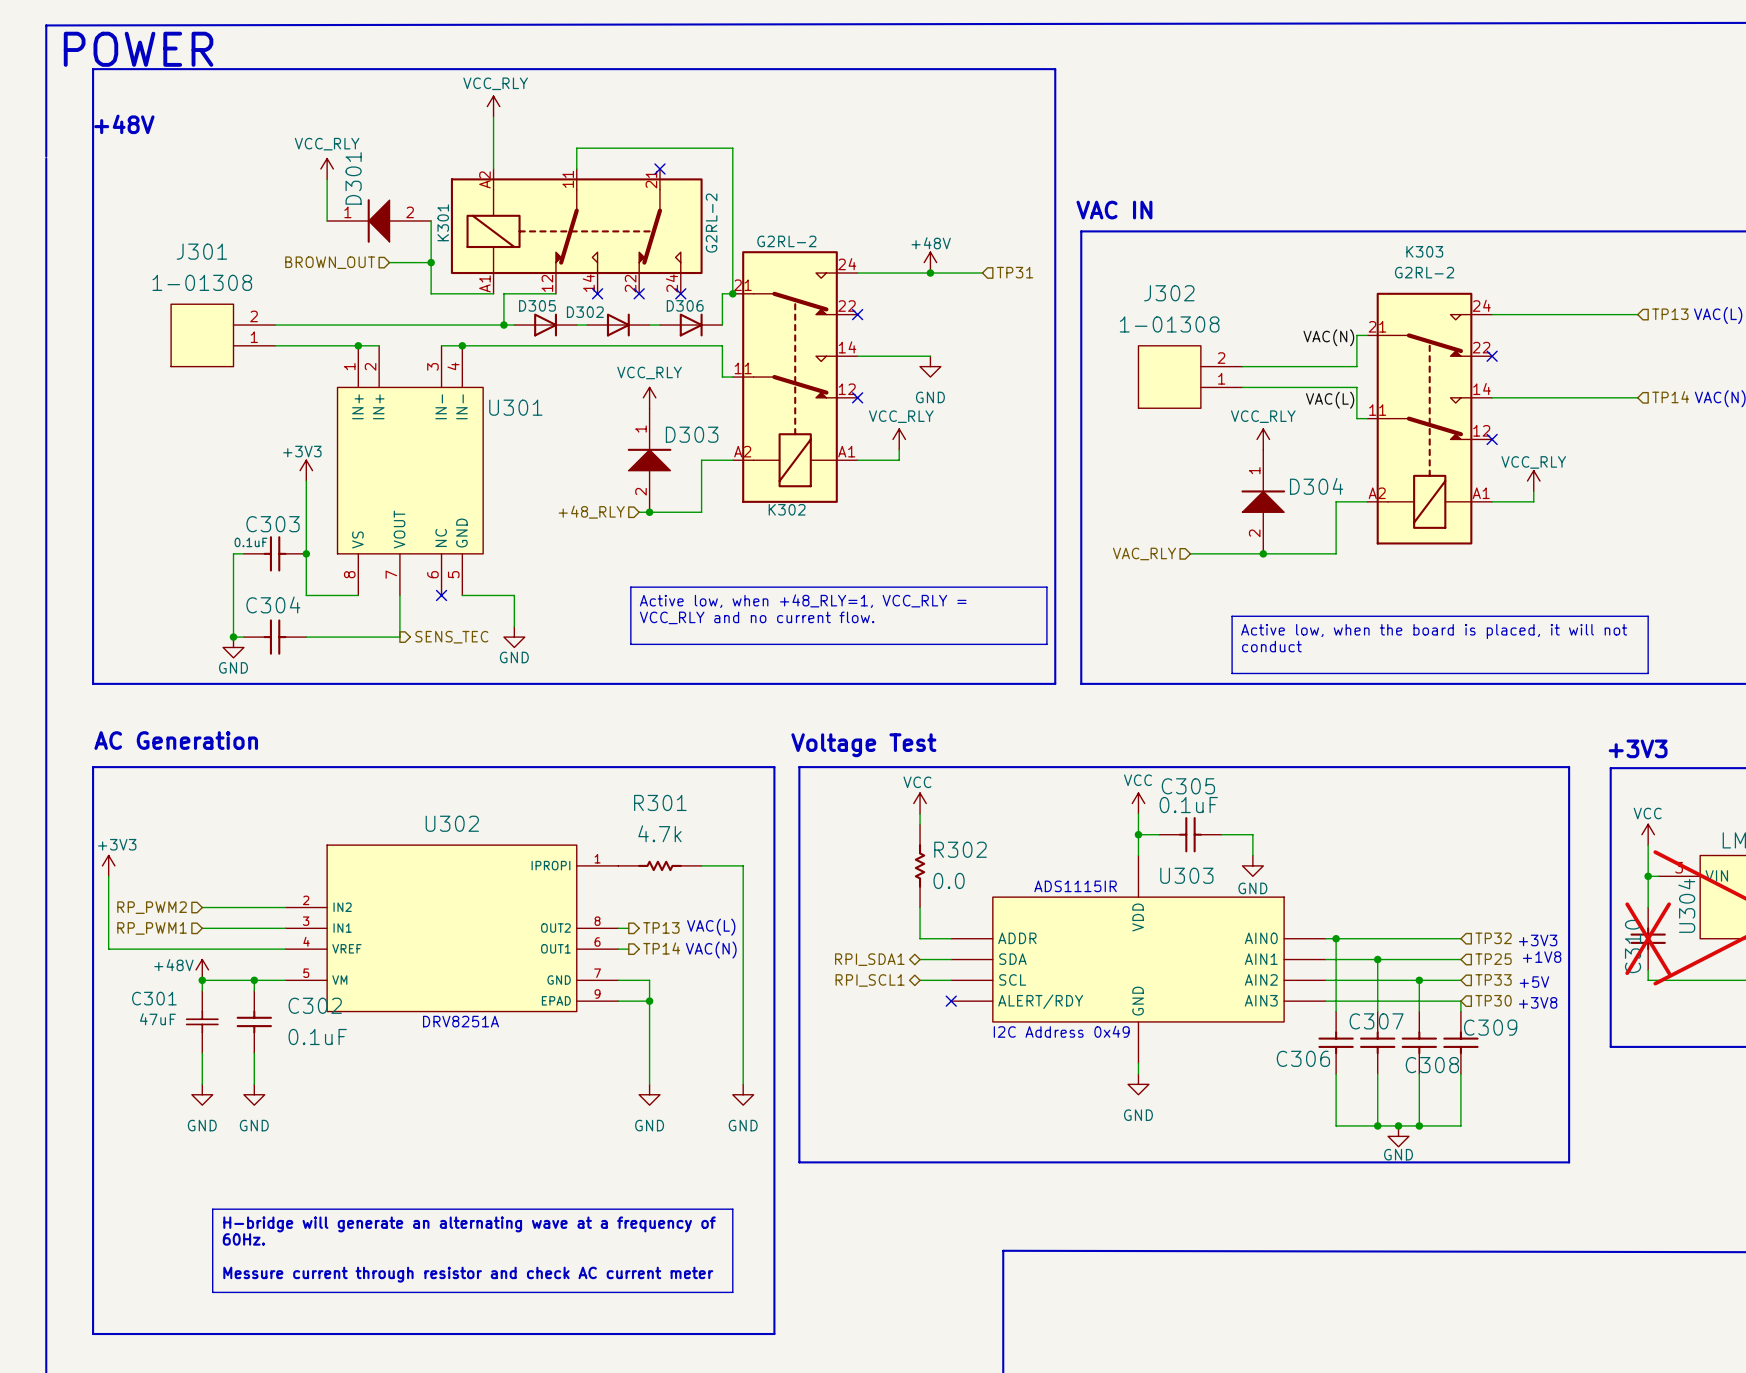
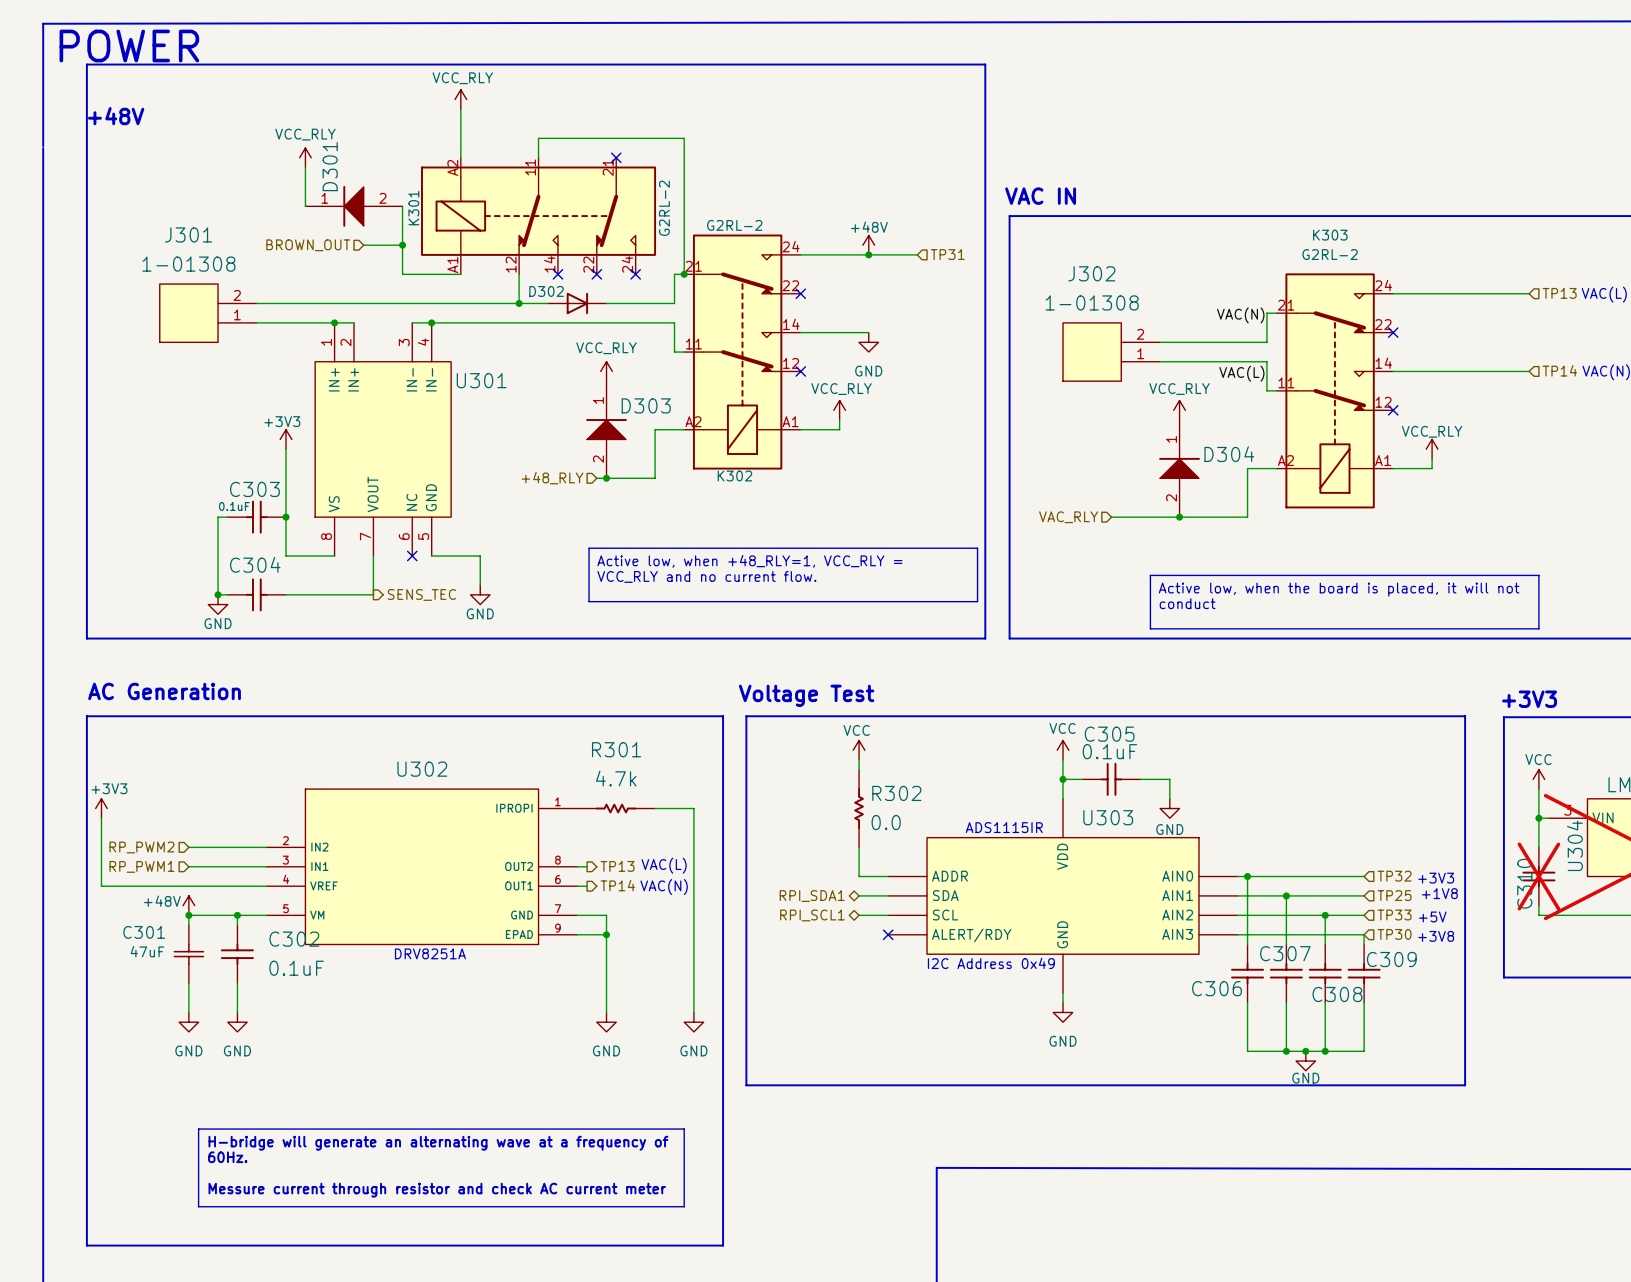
wire: (555, 293) (503, 293) (503, 325) -> (519, 274) (519, 303)
junction: (503, 325) -> none
D305: (545, 325) -> none
junction: none -> (519, 303)
D306: (691, 325) -> none

